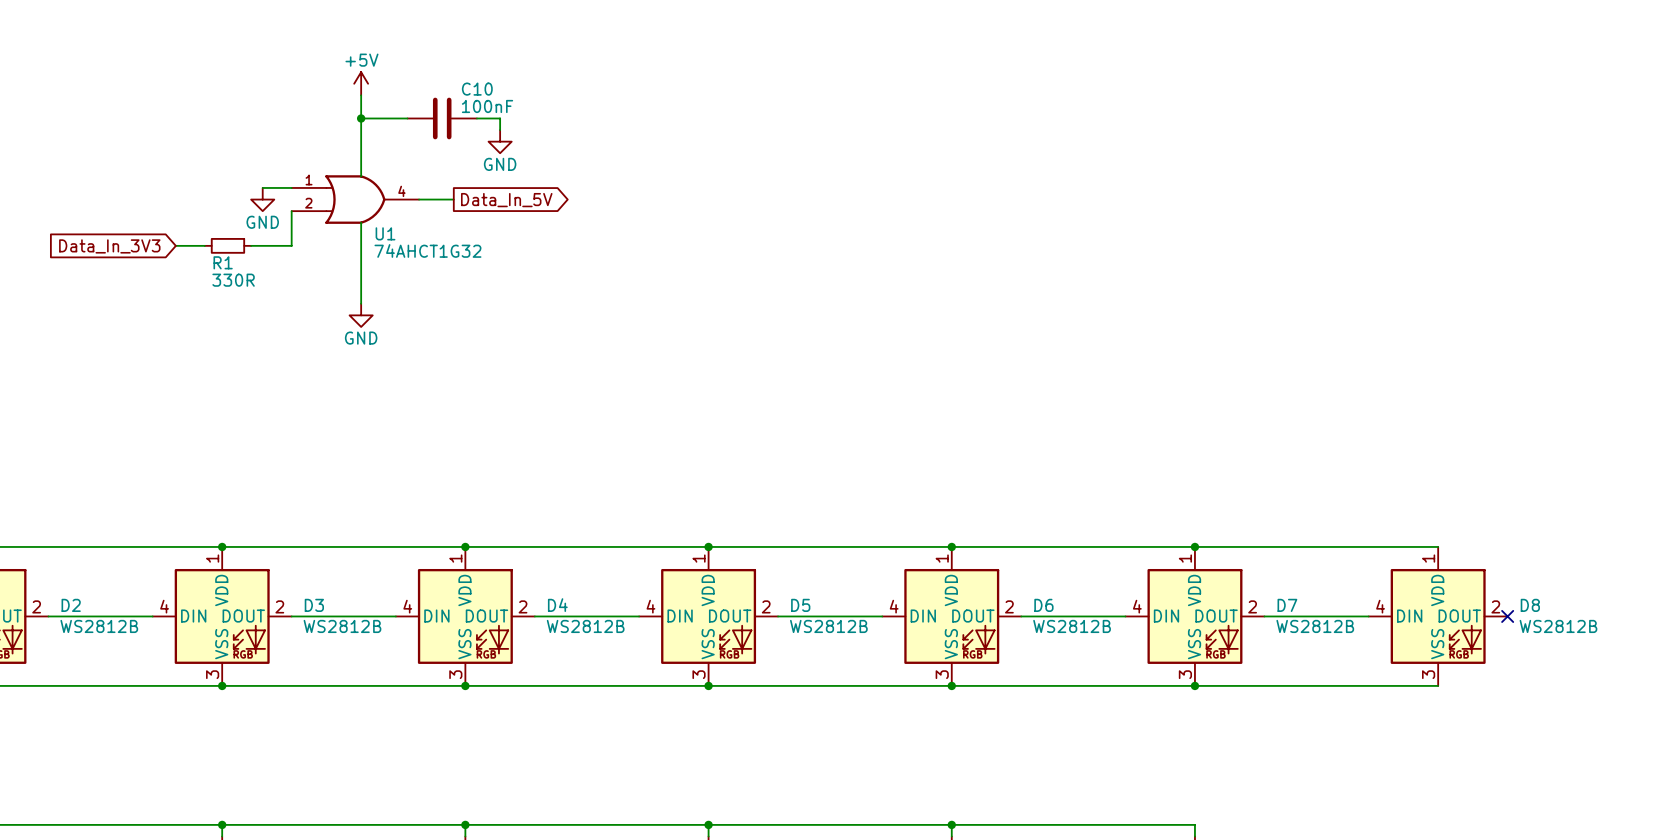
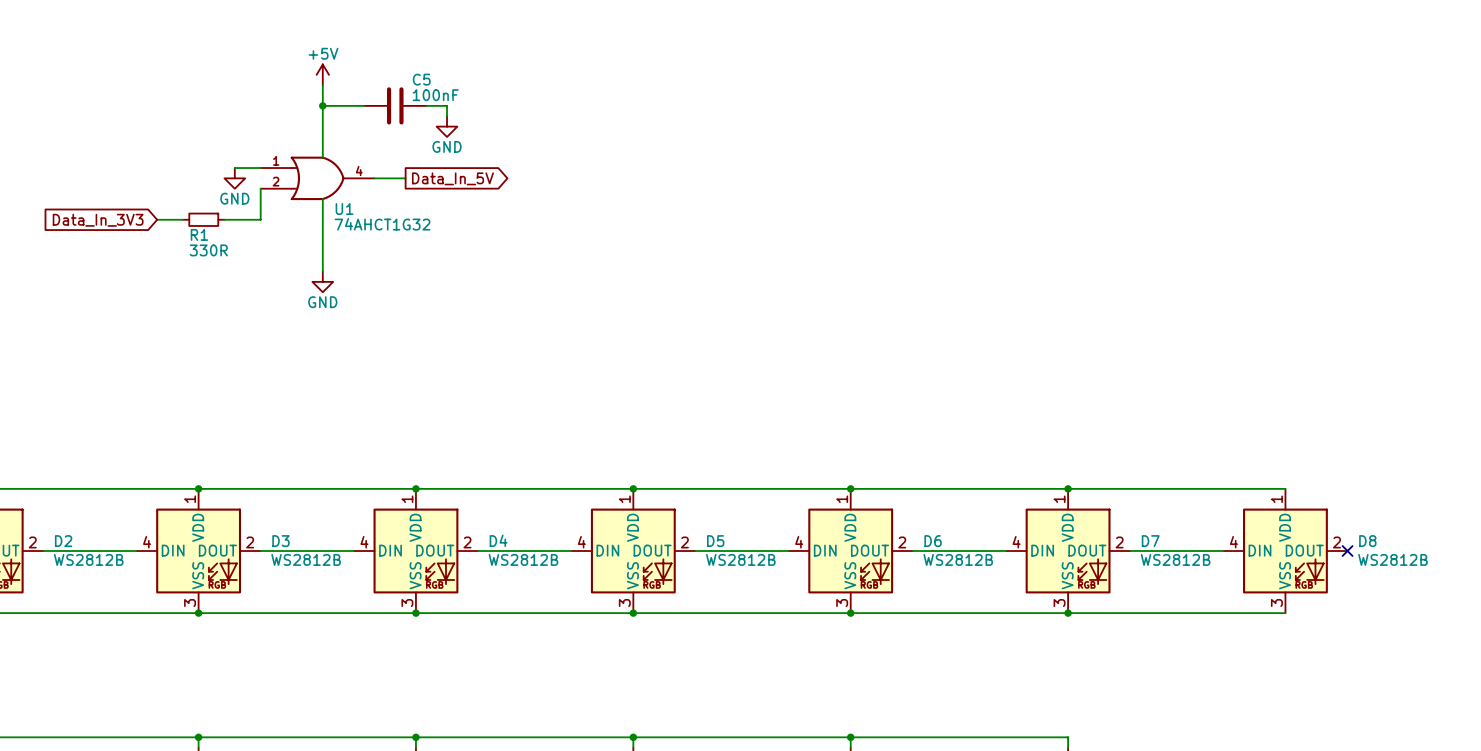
C10 name: C10 (477, 89) -> C5 (421, 79)

